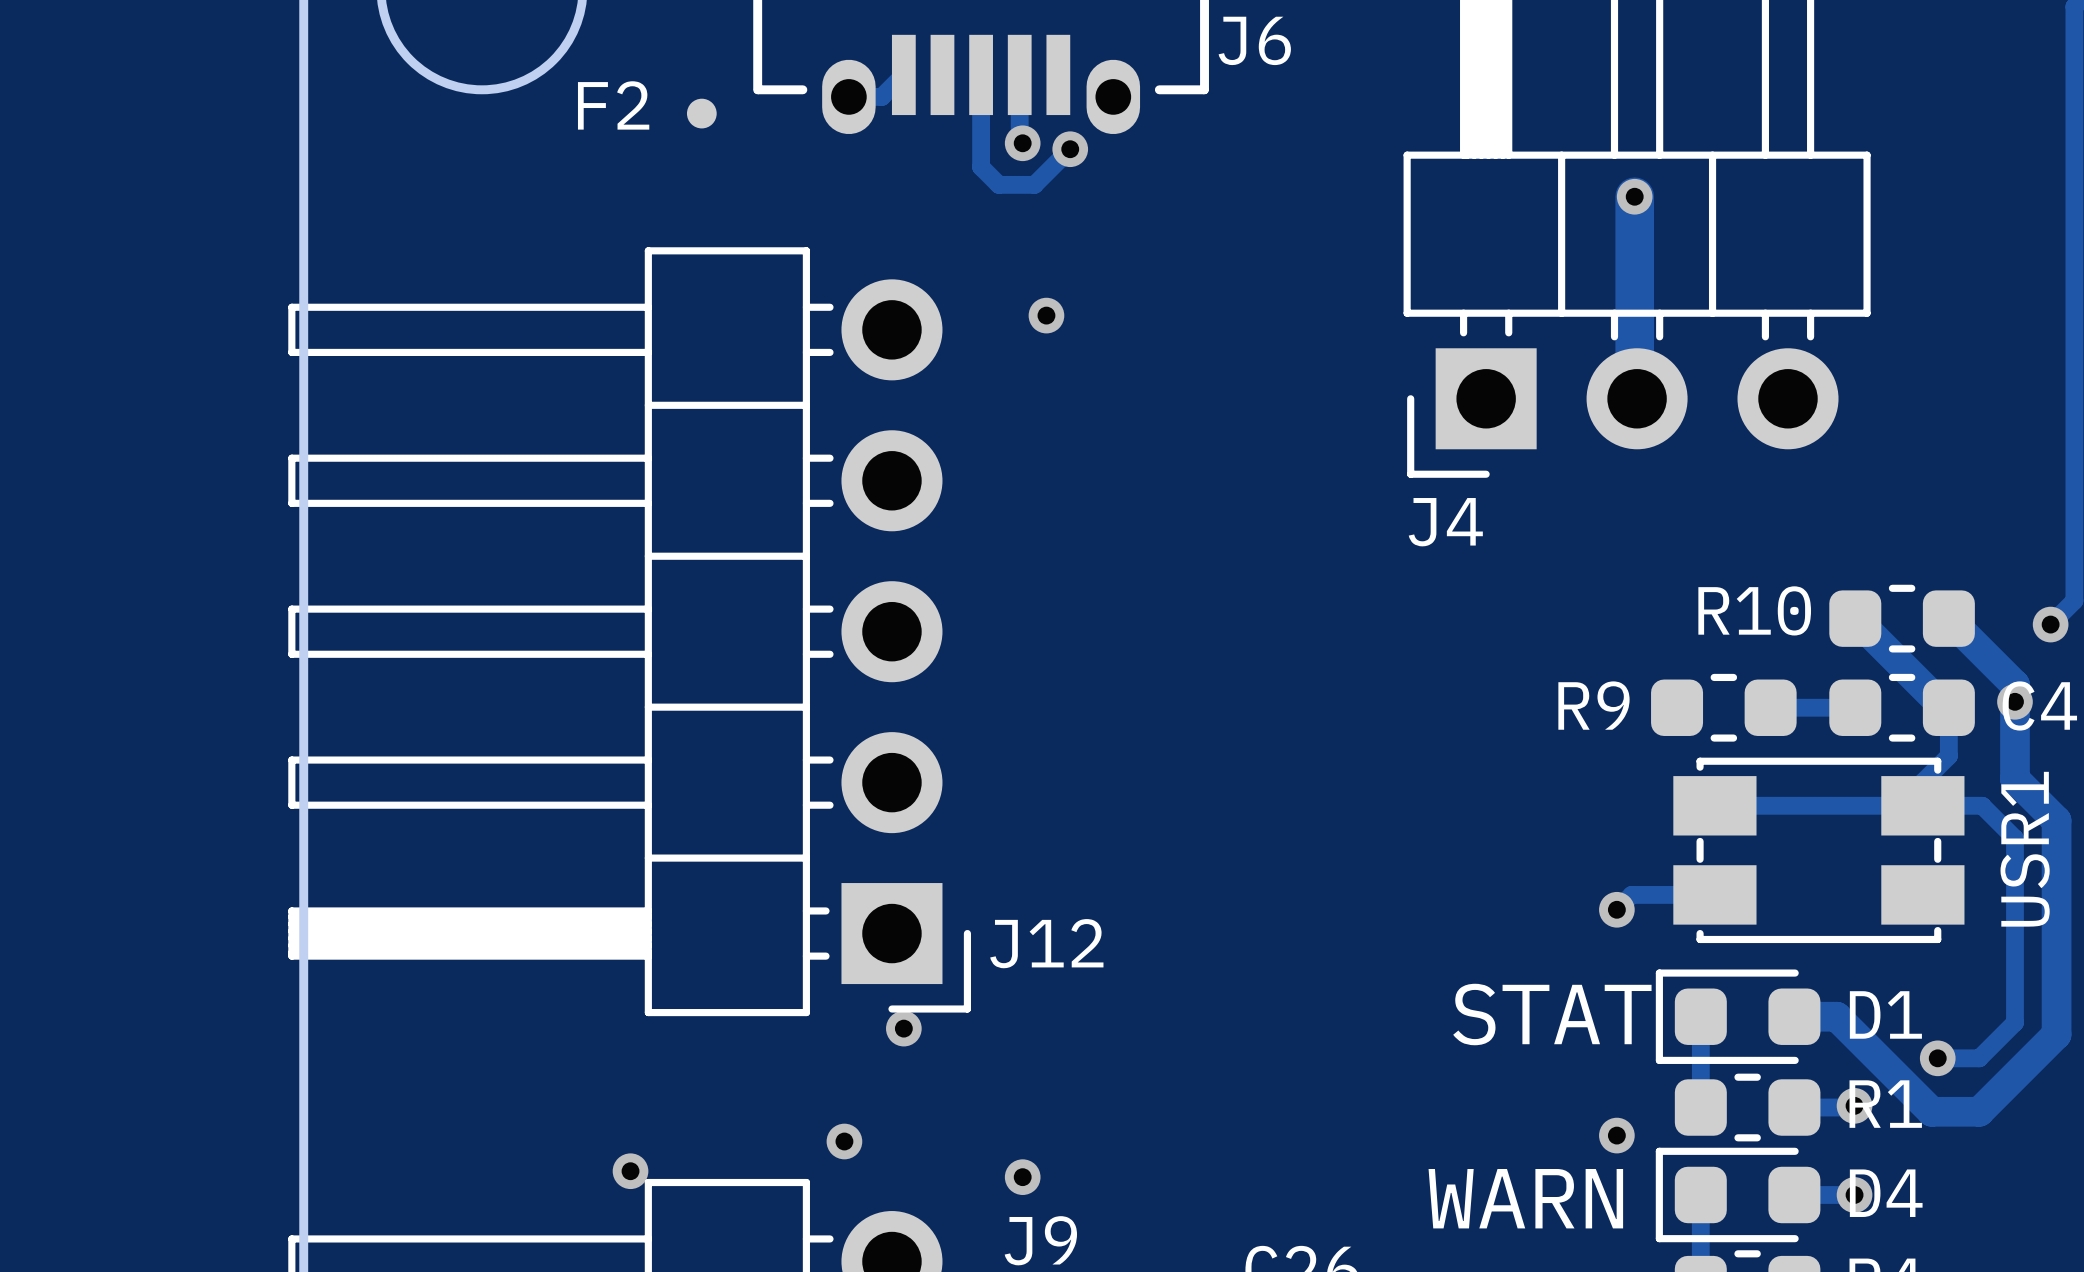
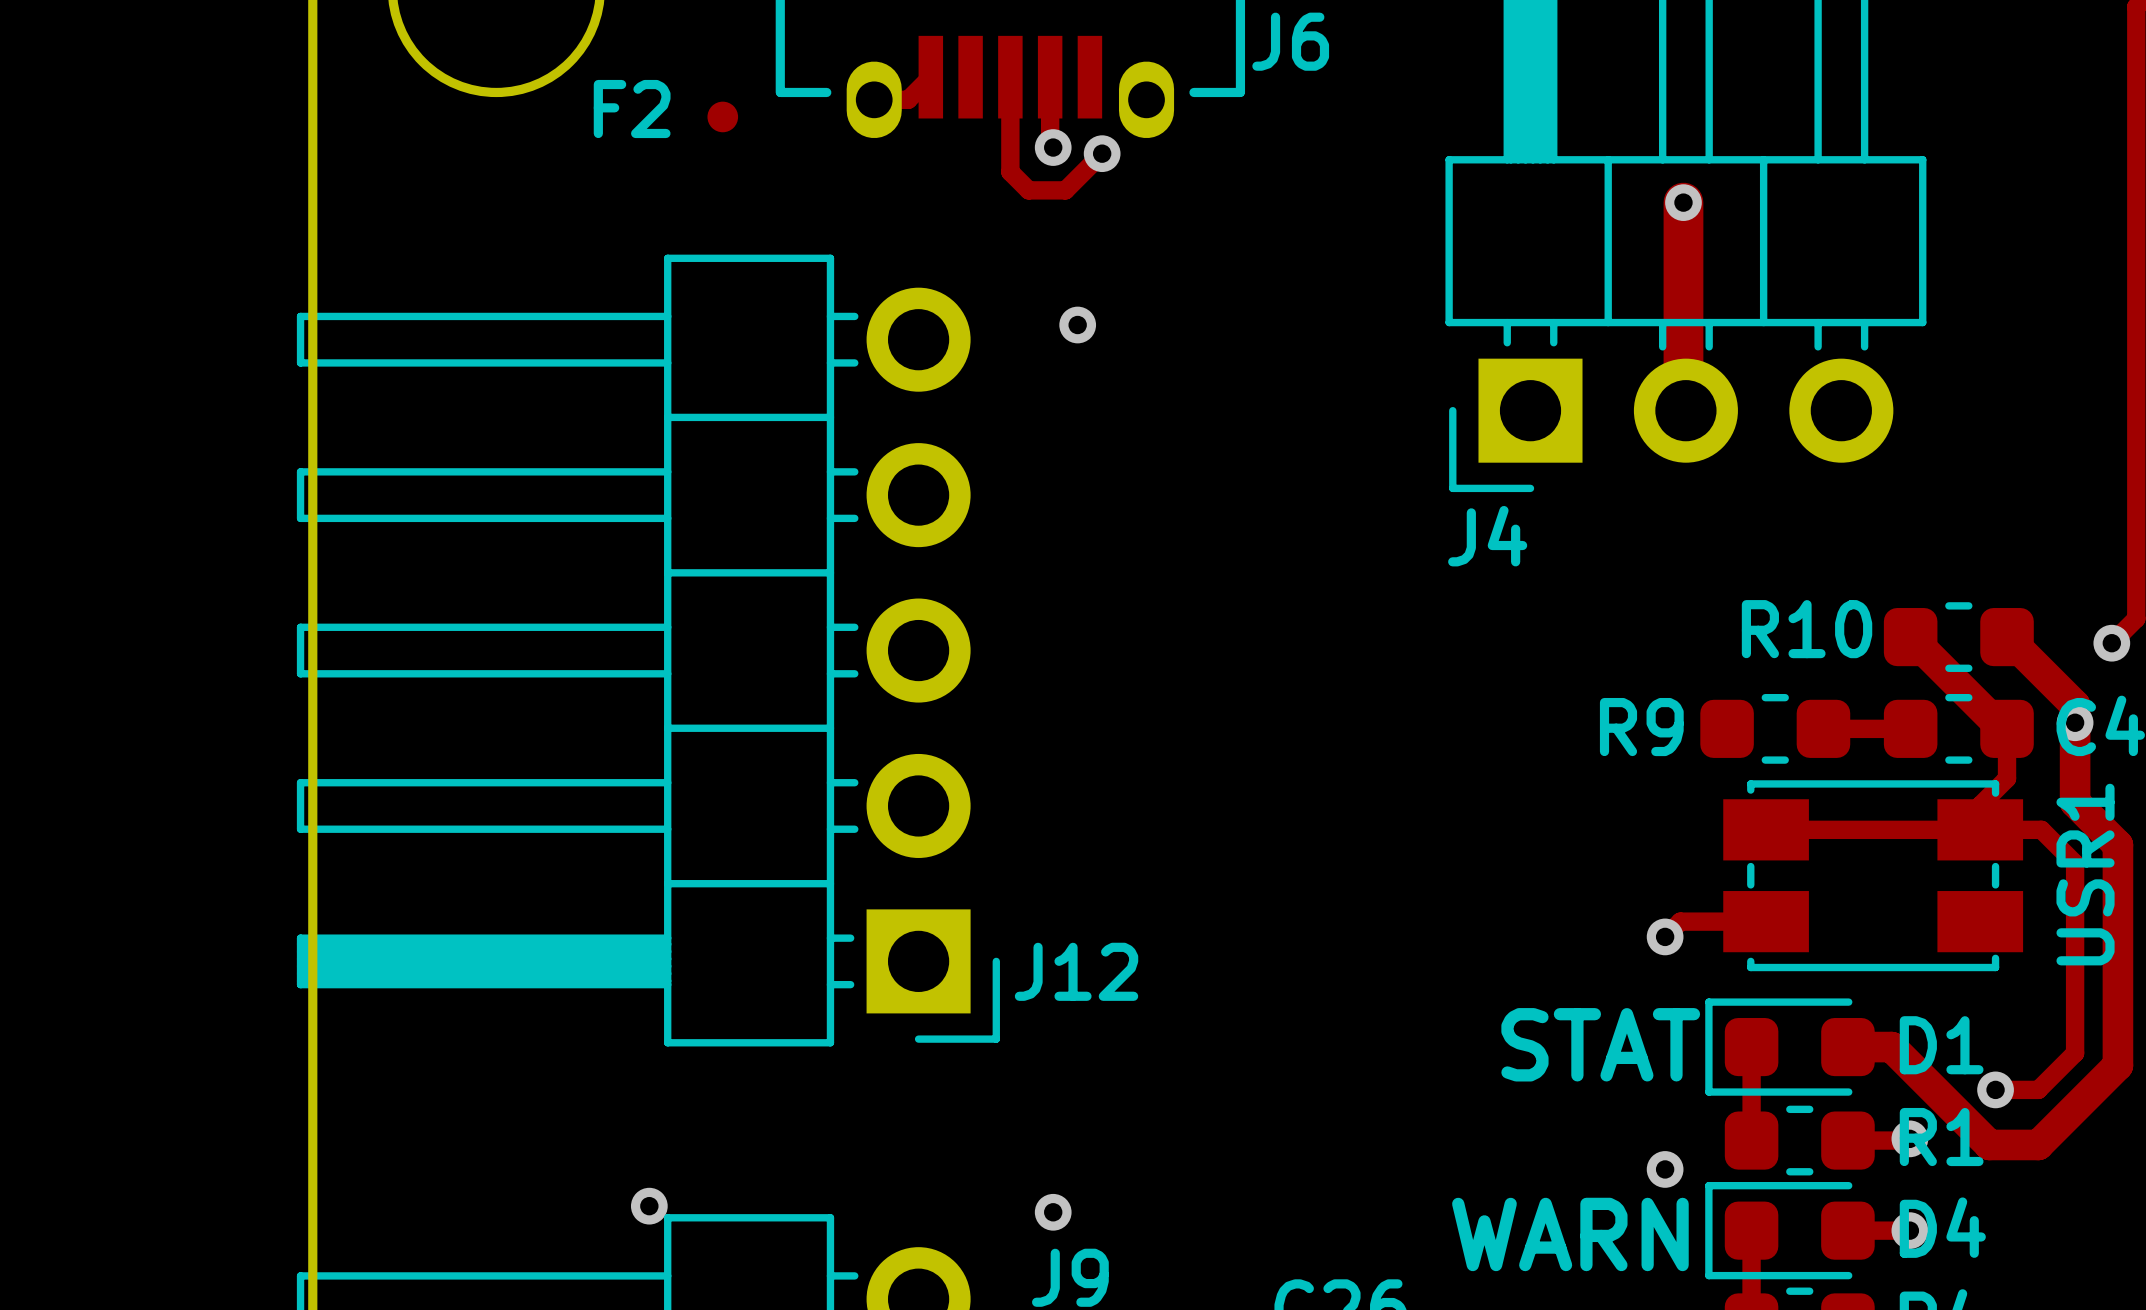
via: (903, 1028) -> none
via: (844, 1141) -> none

